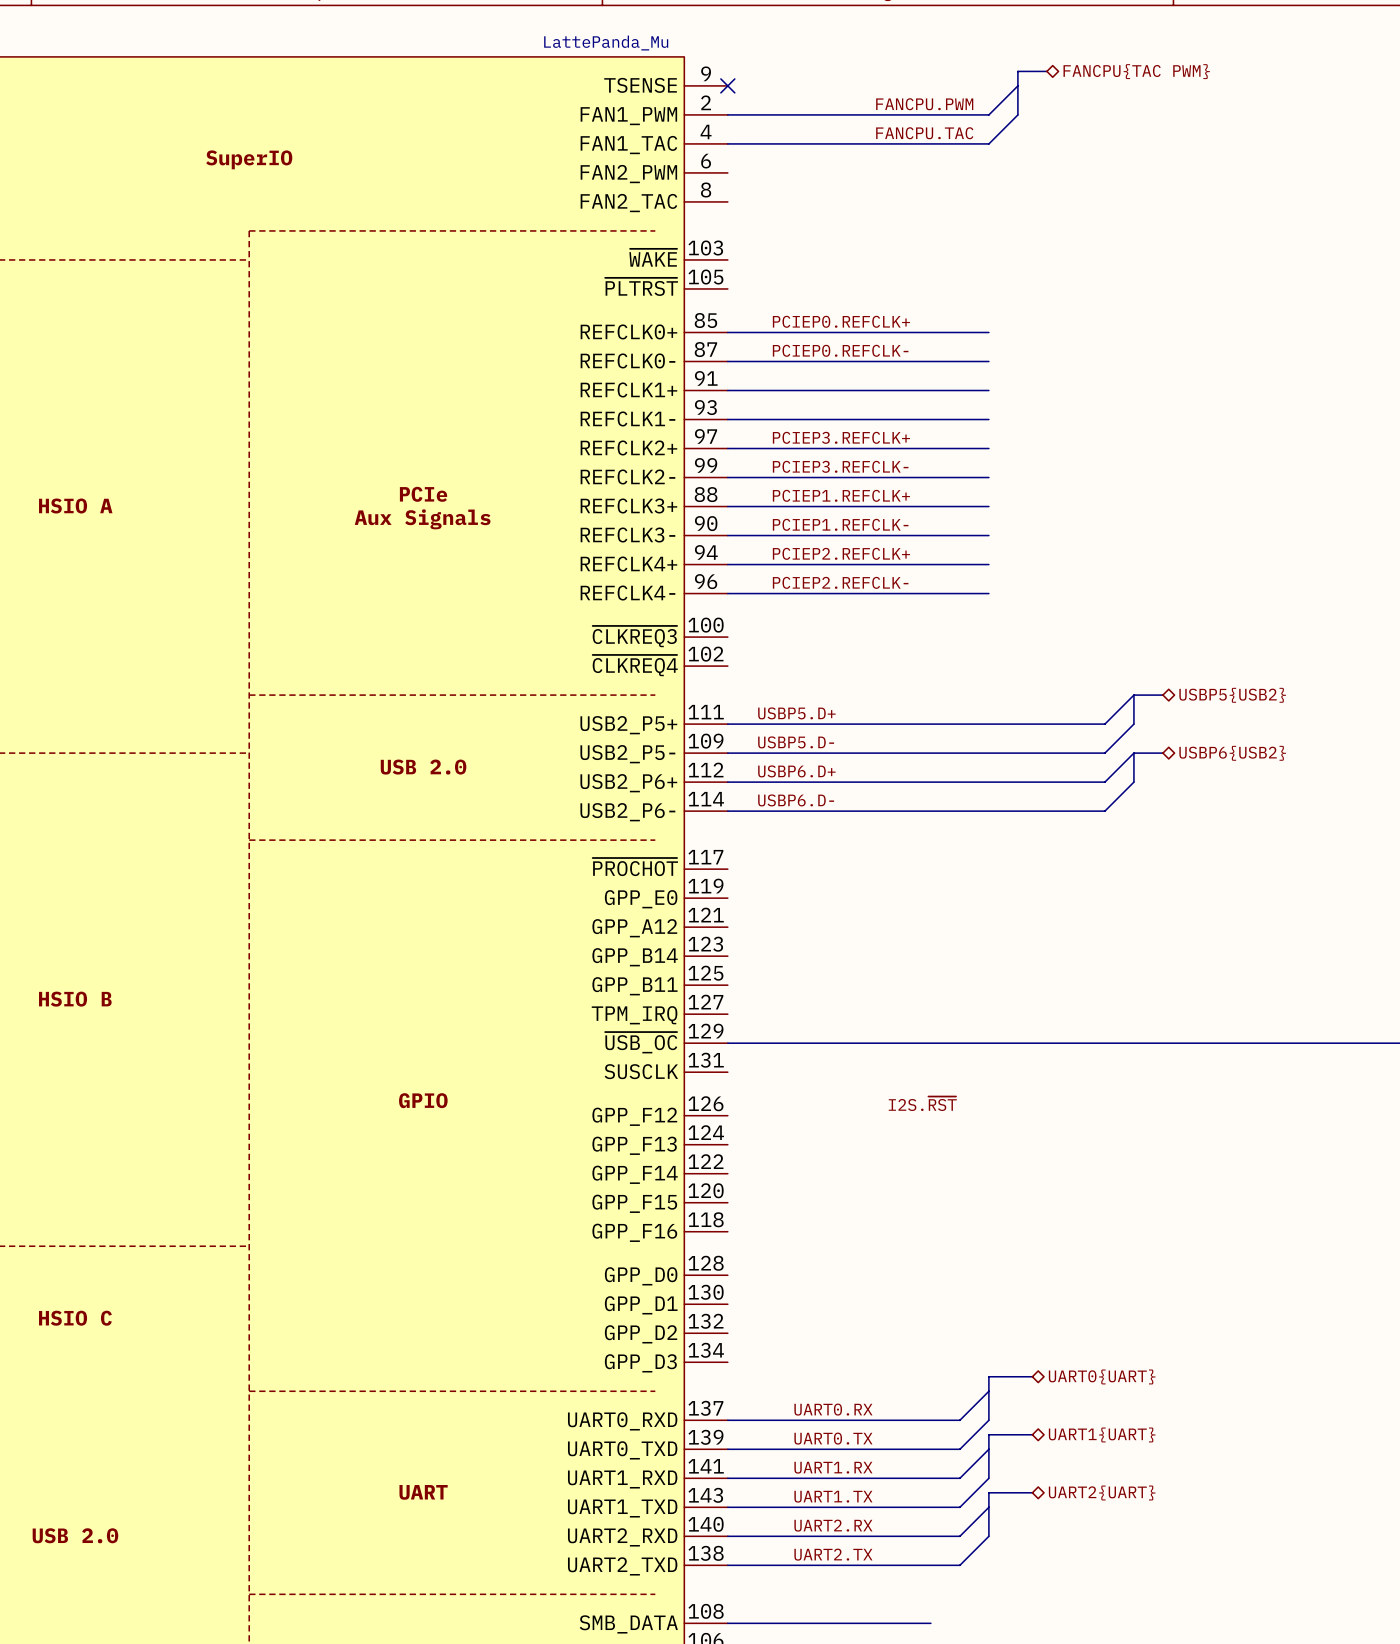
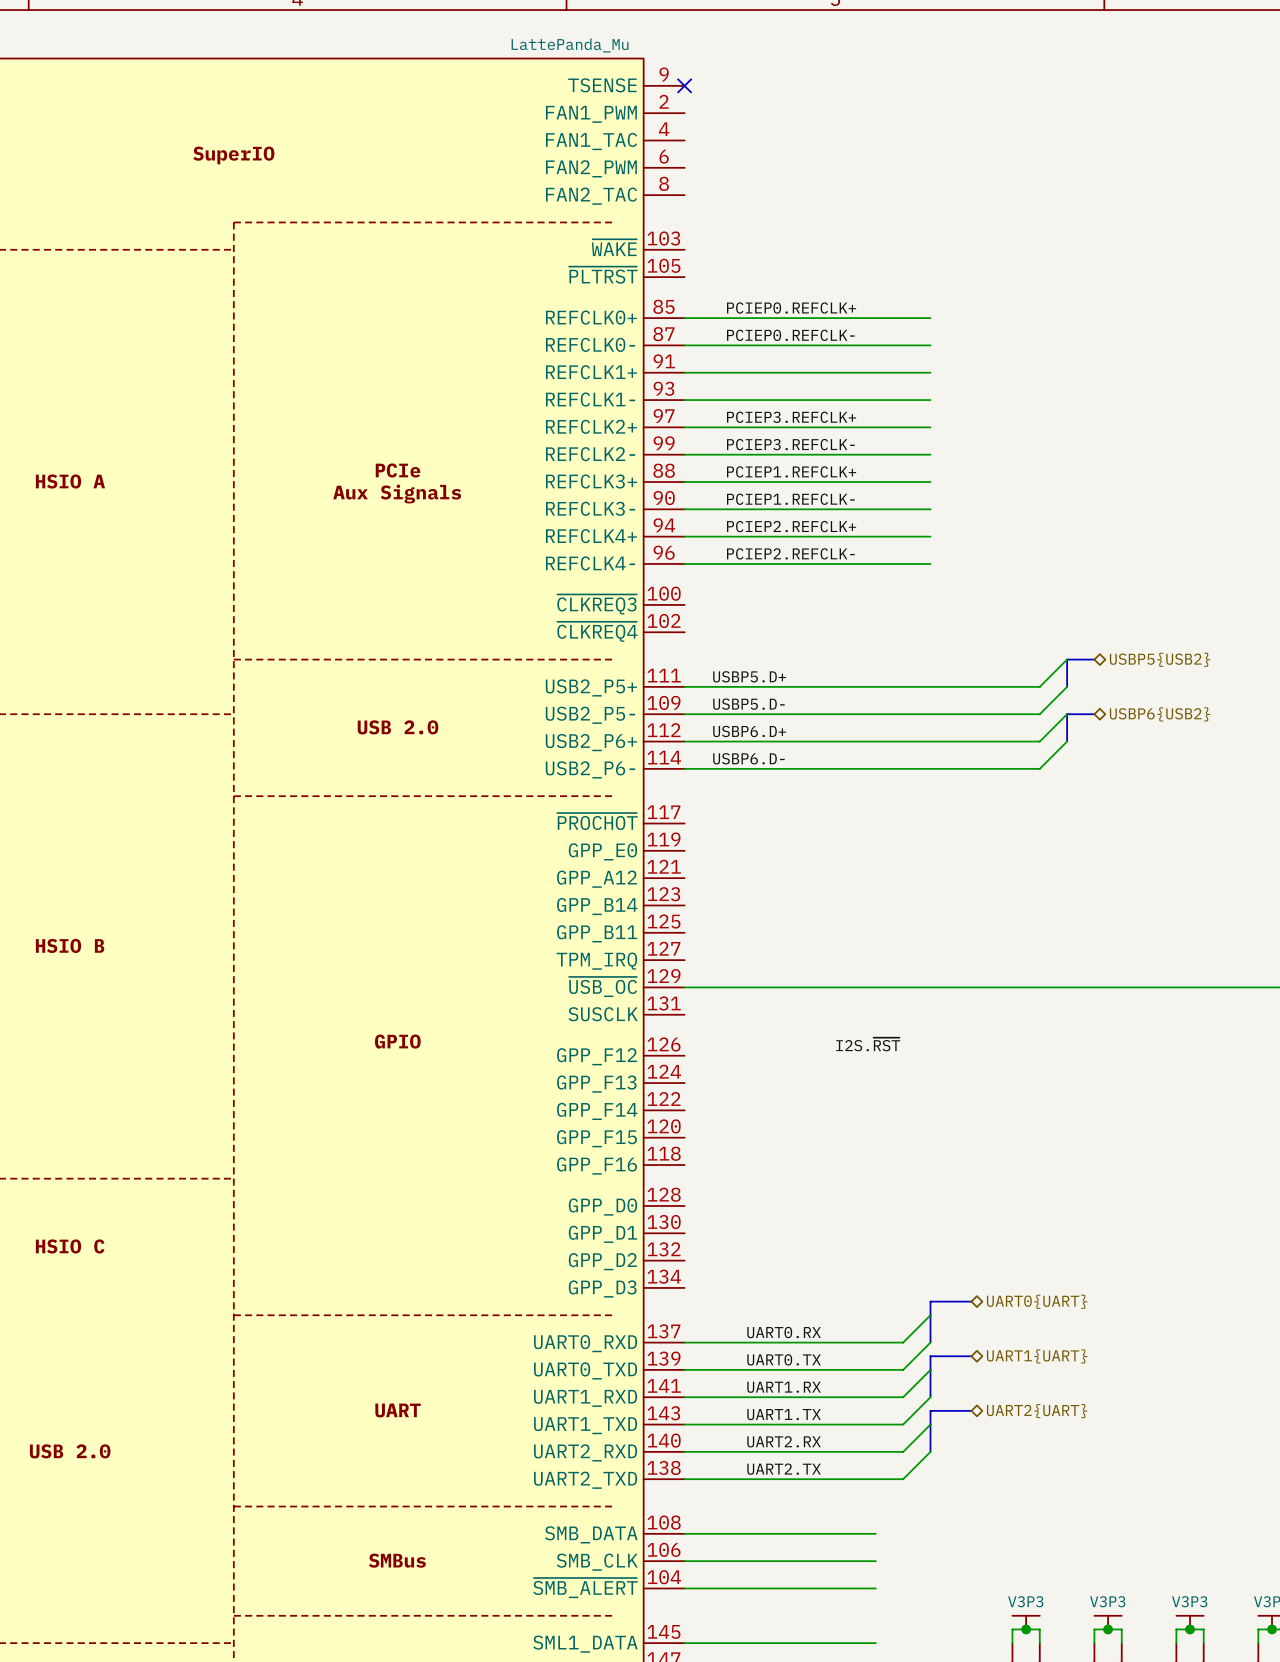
bus: (1046, 71) (1017, 71) (1017, 114) -> none
hierarchical label: FANCPU{TAC PWM} (1136, 71) -> none
wire: (1017, 85) (988, 114) (727, 114) -> none
label: FANCPU.PWM (924, 104) -> none
wire: (1017, 114) (988, 143) (727, 143) -> none
label: FANCPU.TAC (924, 133) -> none

